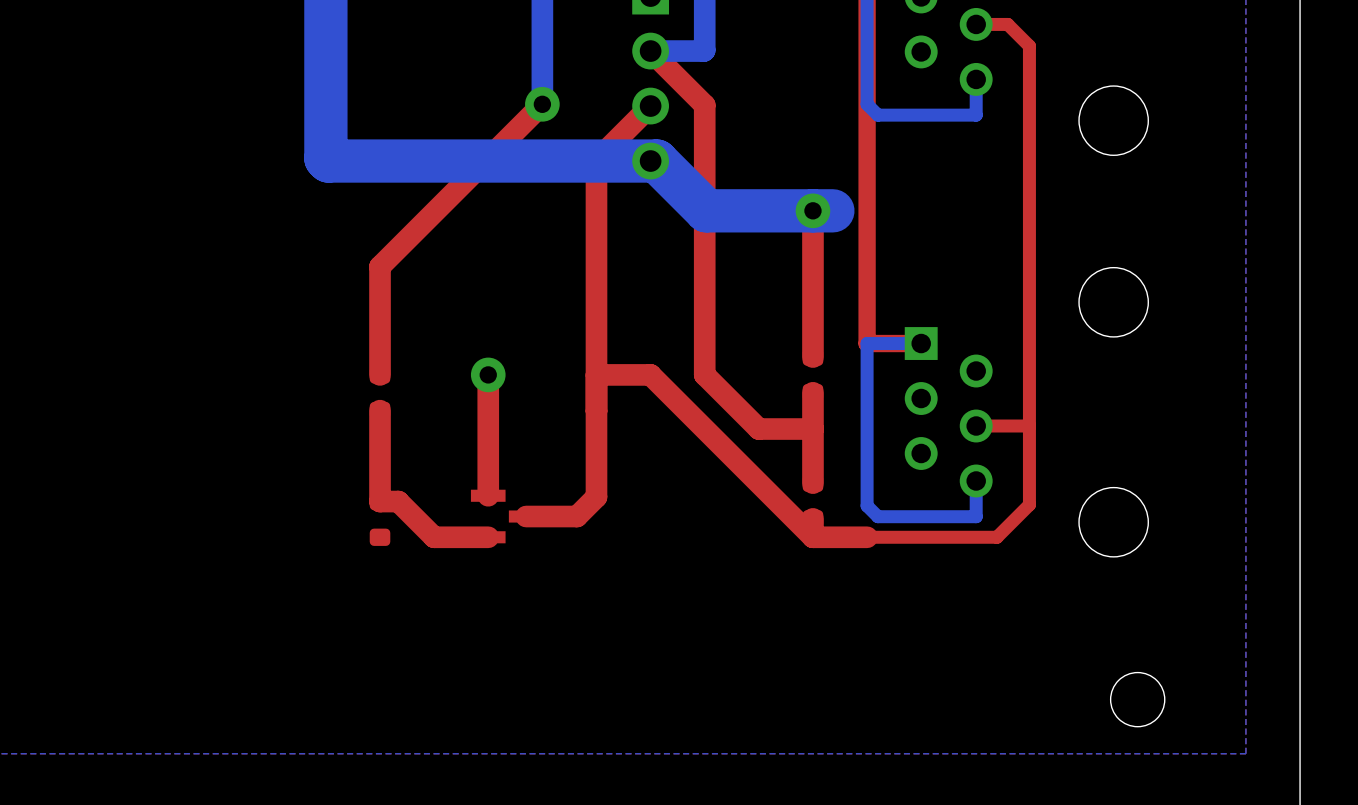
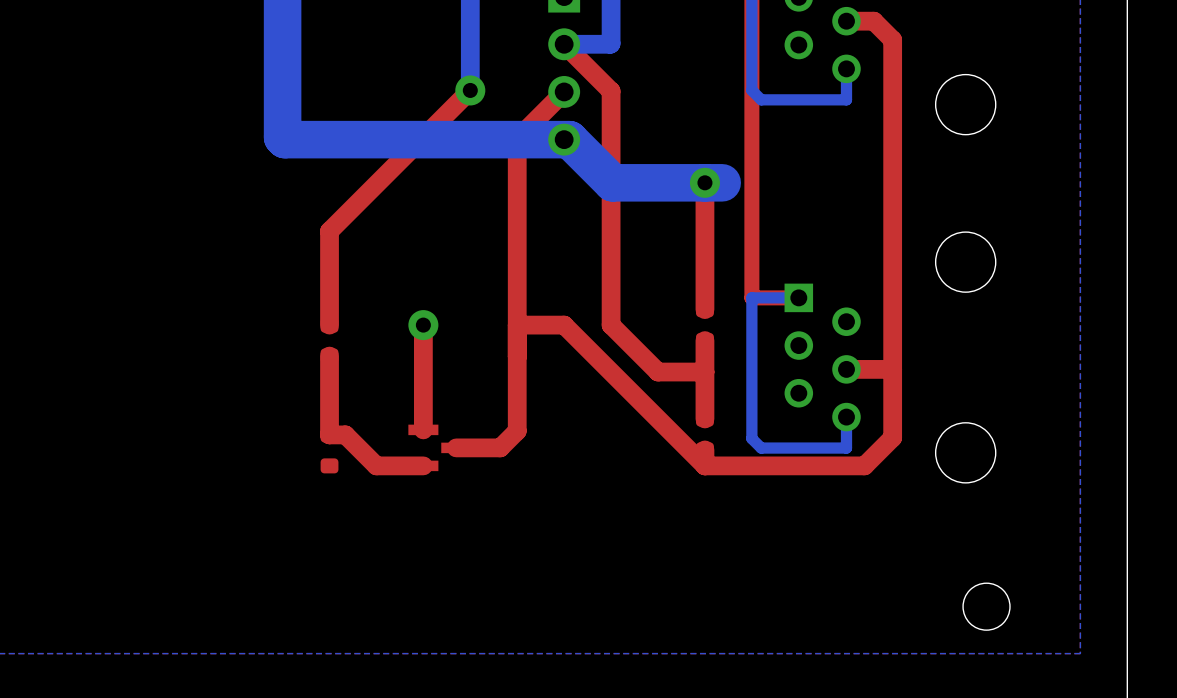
top track width: thin (976, 24) (1007, 24) (1029, 46) (1029, 504) (996, 537) (867, 537) -> thick (846, 21) (873, 21) (892, 39) (892, 437) (864, 465) (751, 465)
top track width: thin (1029, 426) (976, 426) -> thick (892, 369) (846, 369)

